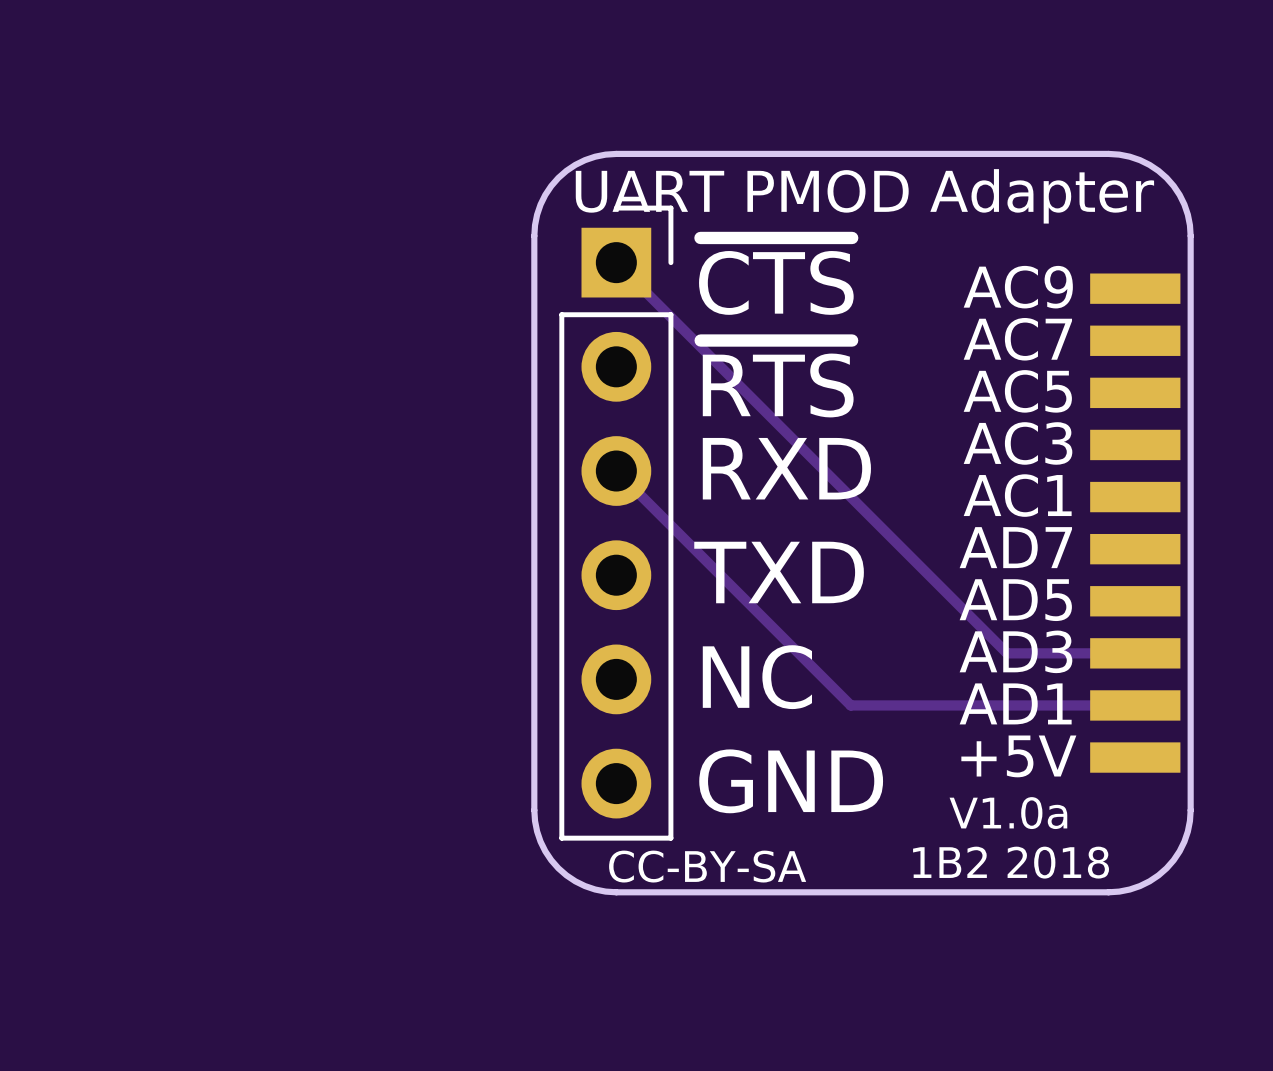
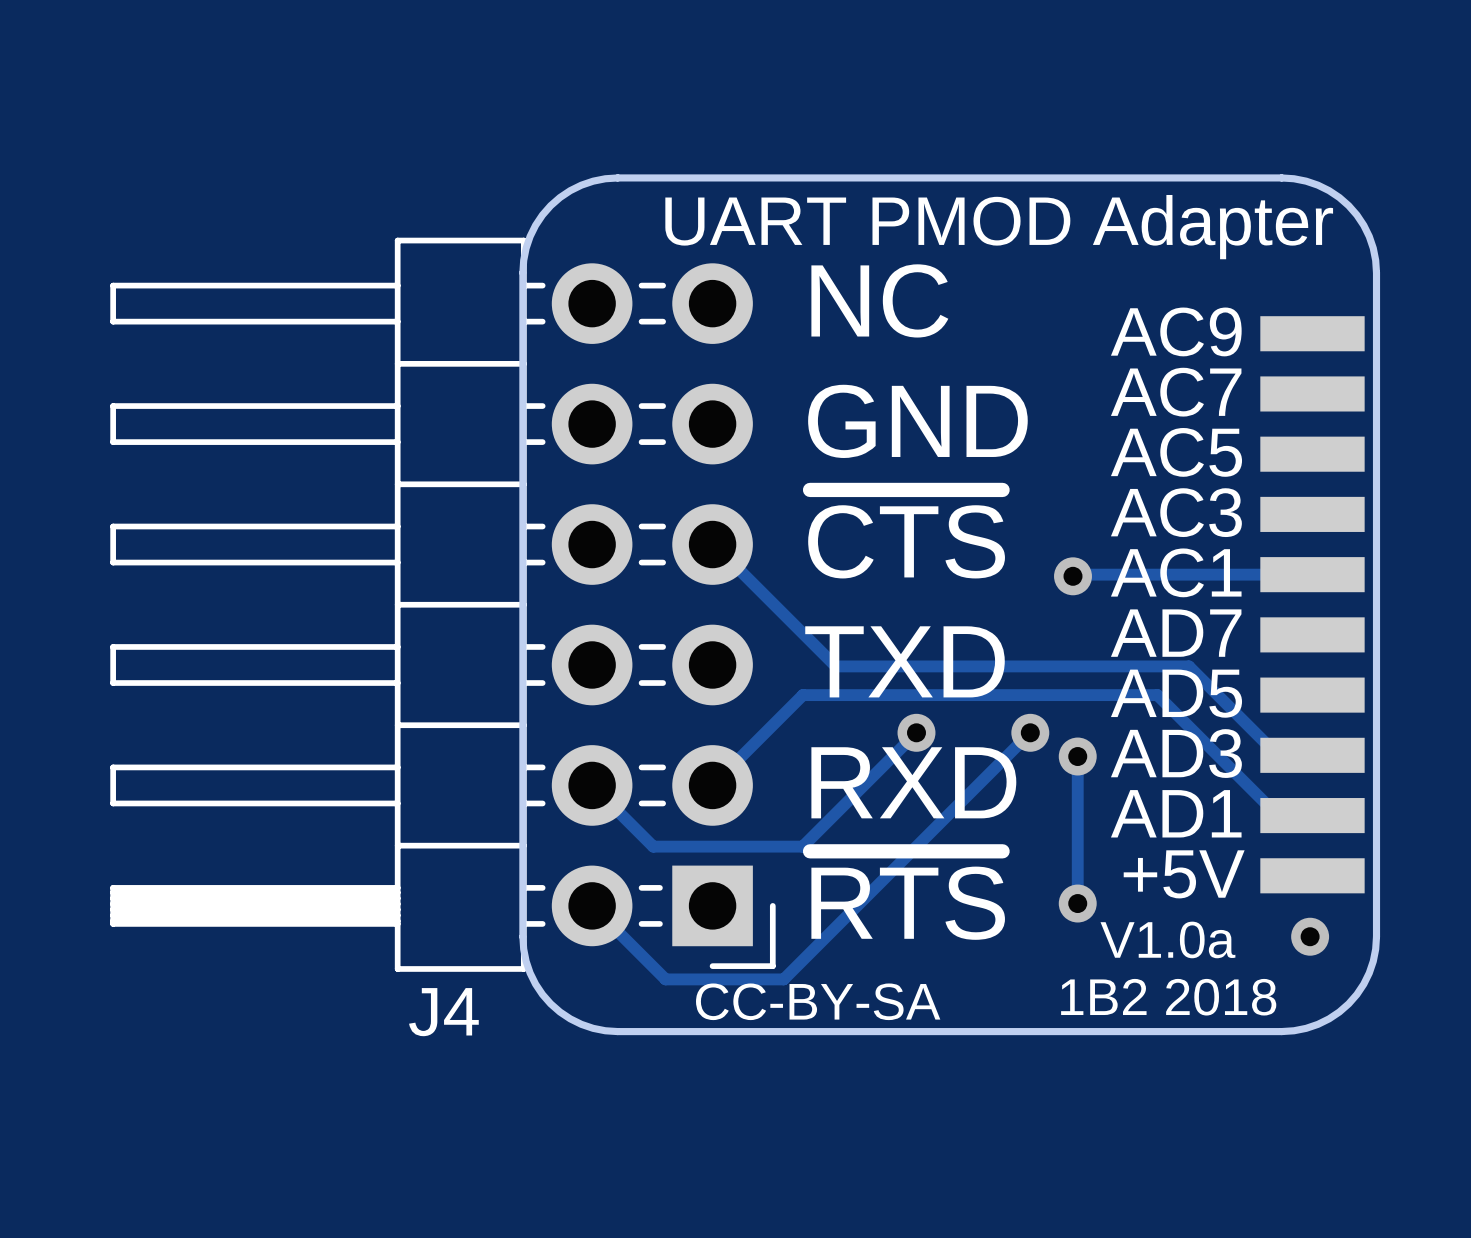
board edge: (616, 153) (584, 160) (558, 177) (540, 204) (534, 235) (535, 820) (545, 851) (566, 875) (595, 889) (616, 892) -> (712, 177) (605, 178) (593, 181) (570, 190) (550, 205) (535, 225) (526, 248) (522, 272) (522, 936) (526, 961) (530, 973) (542, 994) (559, 1011) (581, 1024) (593, 1028) (617, 1031) (712, 1031)
track: (616, 262) (1007, 653) (1105, 653) -> none
text: ~{CTS} (776, 276) -> NC (879, 300)
text: ~{RTS} (777, 378) -> GND (917, 421)
text: RXD (786, 468) -> ~{CTS} (906, 534)
track: (616, 471) (850, 705) (1105, 705) -> (712, 544) (835, 666) (1188, 666) (1277, 755)
track: none -> (1312, 574) (1074, 574) (1073, 576)
via: none -> (1073, 576)
J4: none -> (442, 604)
part: (616, 523) -> none
track: none -> (916, 732) (802, 846) (653, 846) (592, 785)
via: none -> (916, 732)
track: none -> (1030, 732) (783, 979) (665, 979) (592, 905)
via: none -> (1030, 732)
track: none -> (1077, 756) (1077, 903)
via: none -> (1077, 756)
text: NC (757, 677) -> RXD (913, 782)
track: none -> (712, 785) (802, 695) (1157, 695) (1277, 815)
text: GND (791, 781) -> ~{RTS} (907, 895)
via: none -> (1077, 903)
via: none -> (1310, 936)

